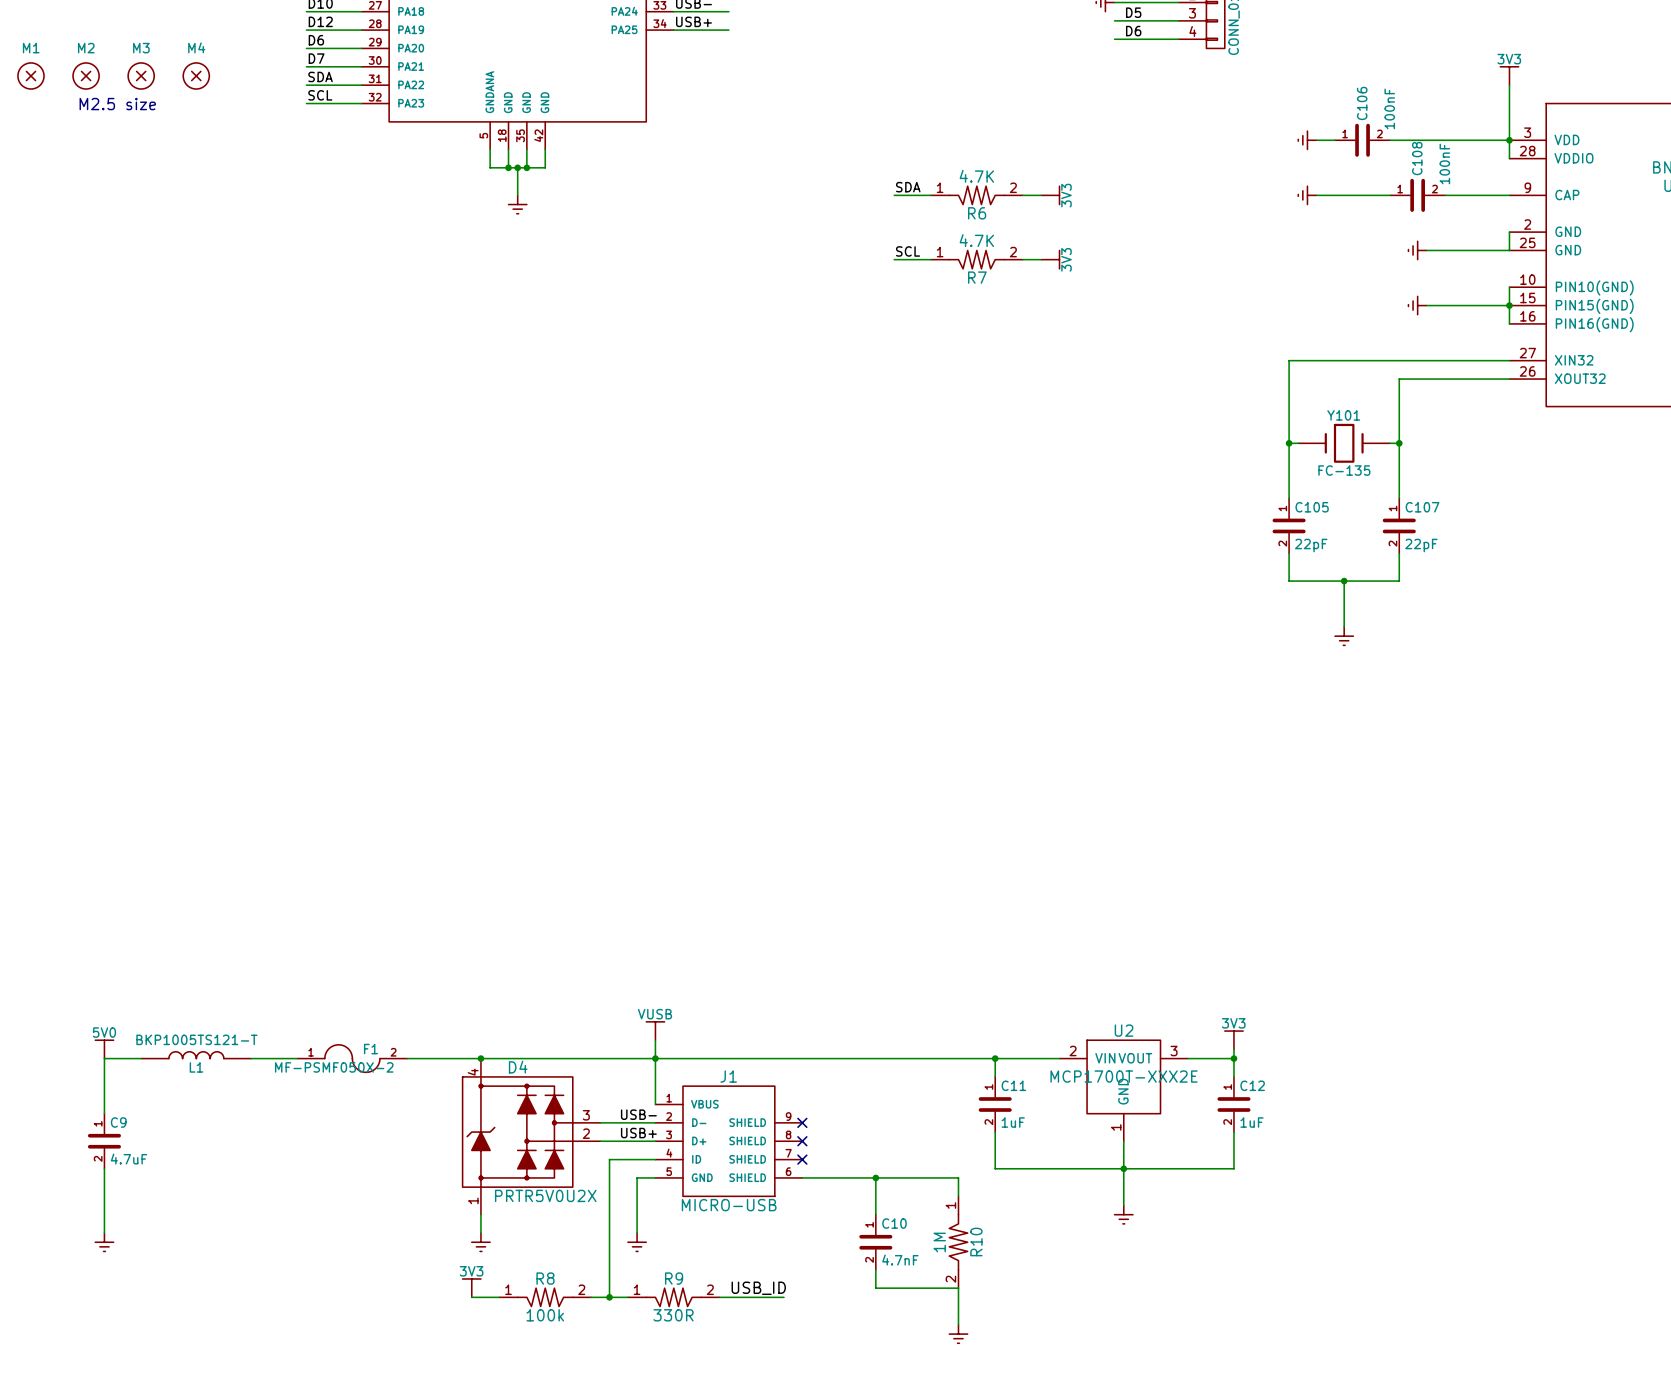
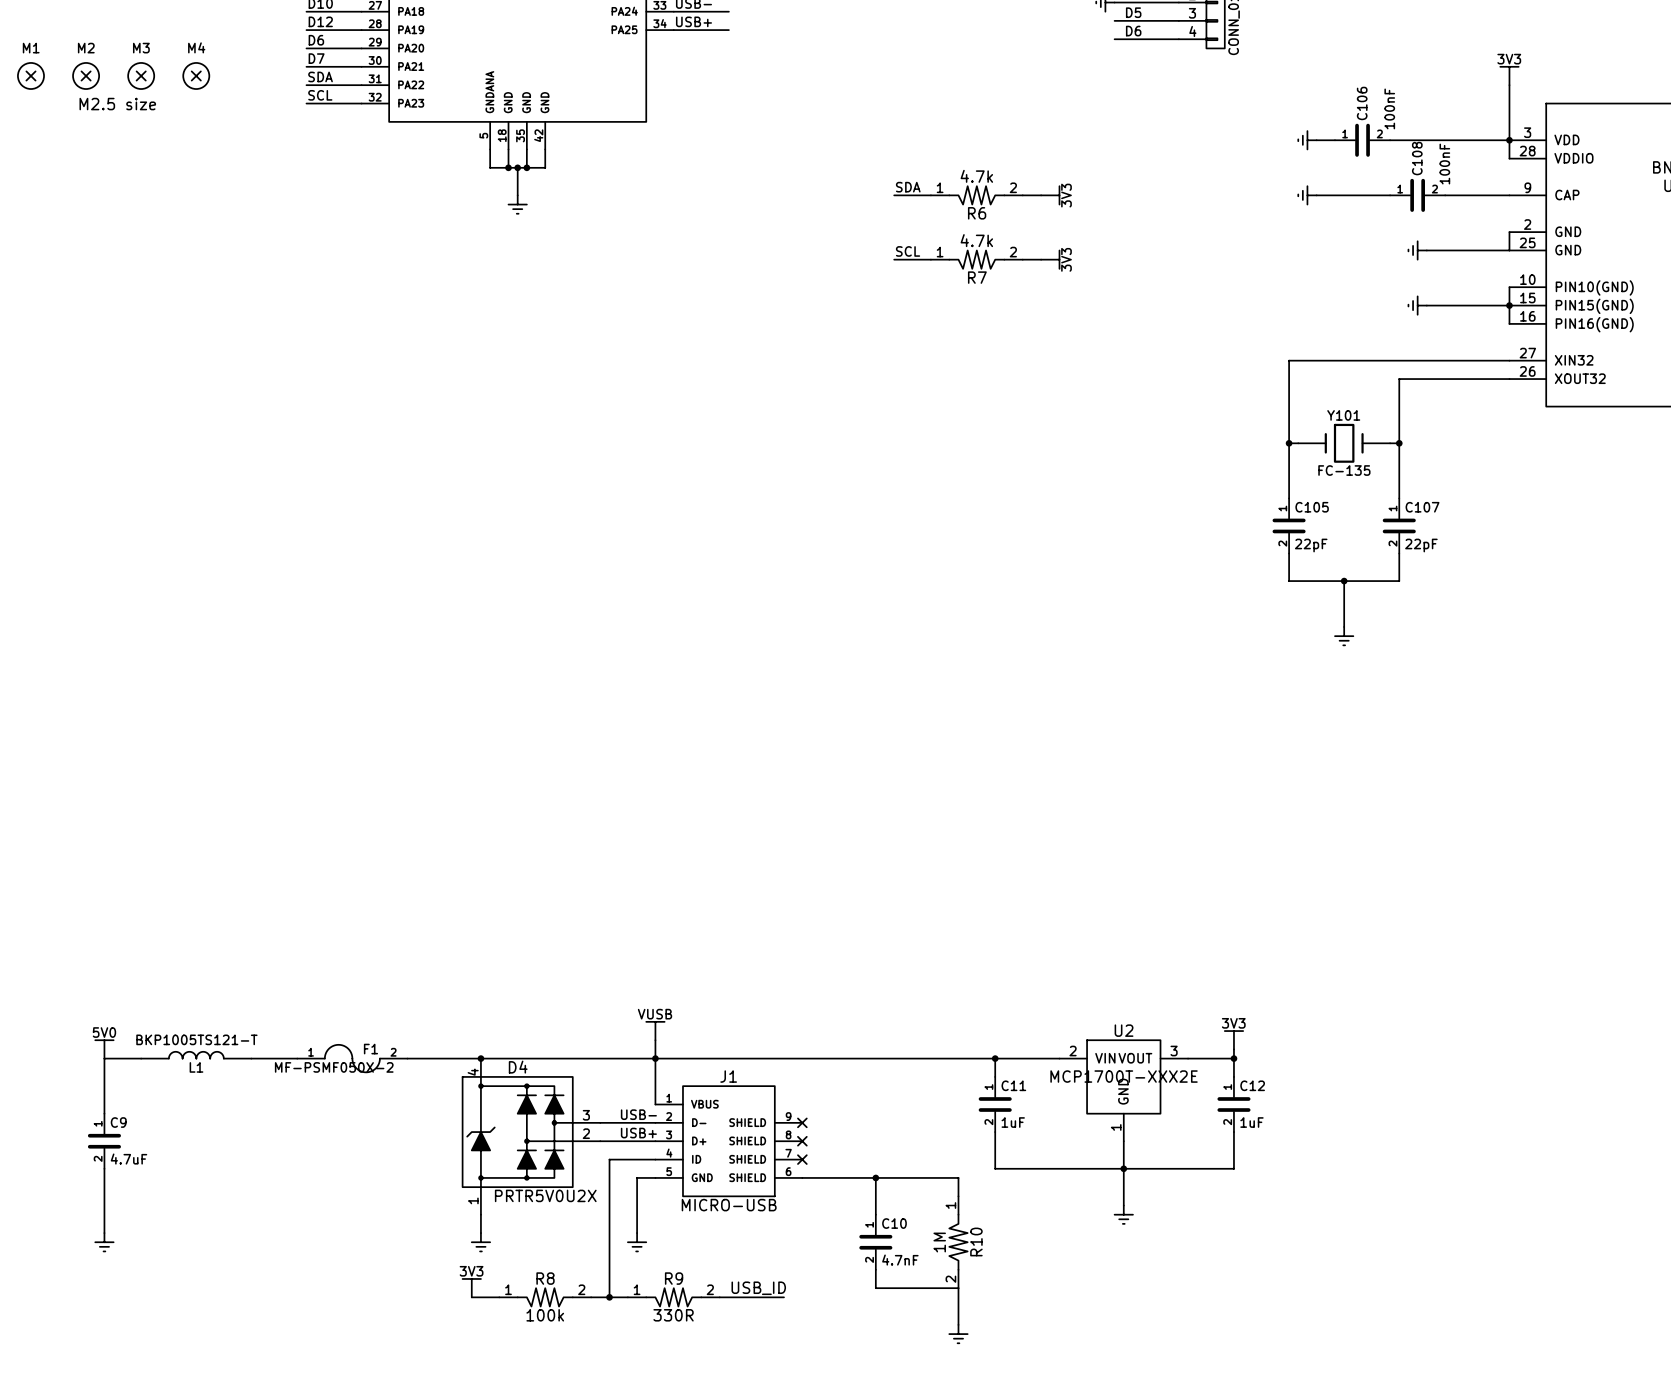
R6 value: 4.7K (976, 176) -> 4.7k (976, 176)
R7 value: 4.7K (976, 240) -> 4.7k (976, 240)

